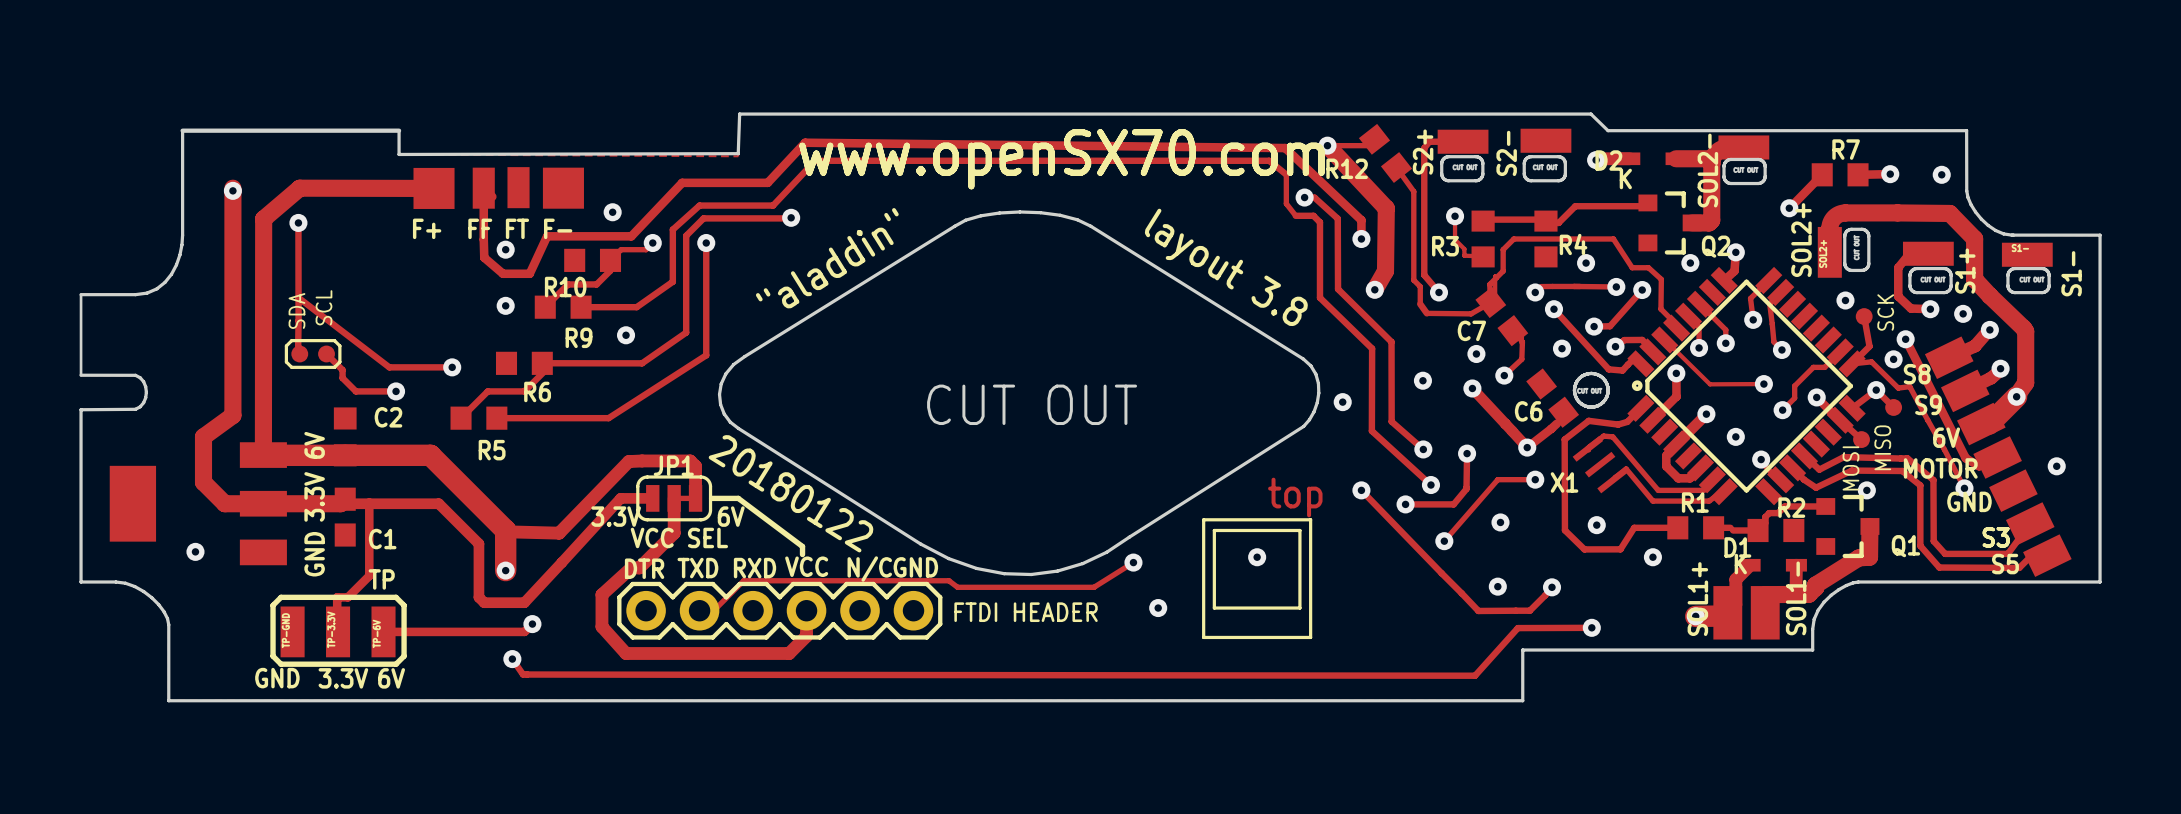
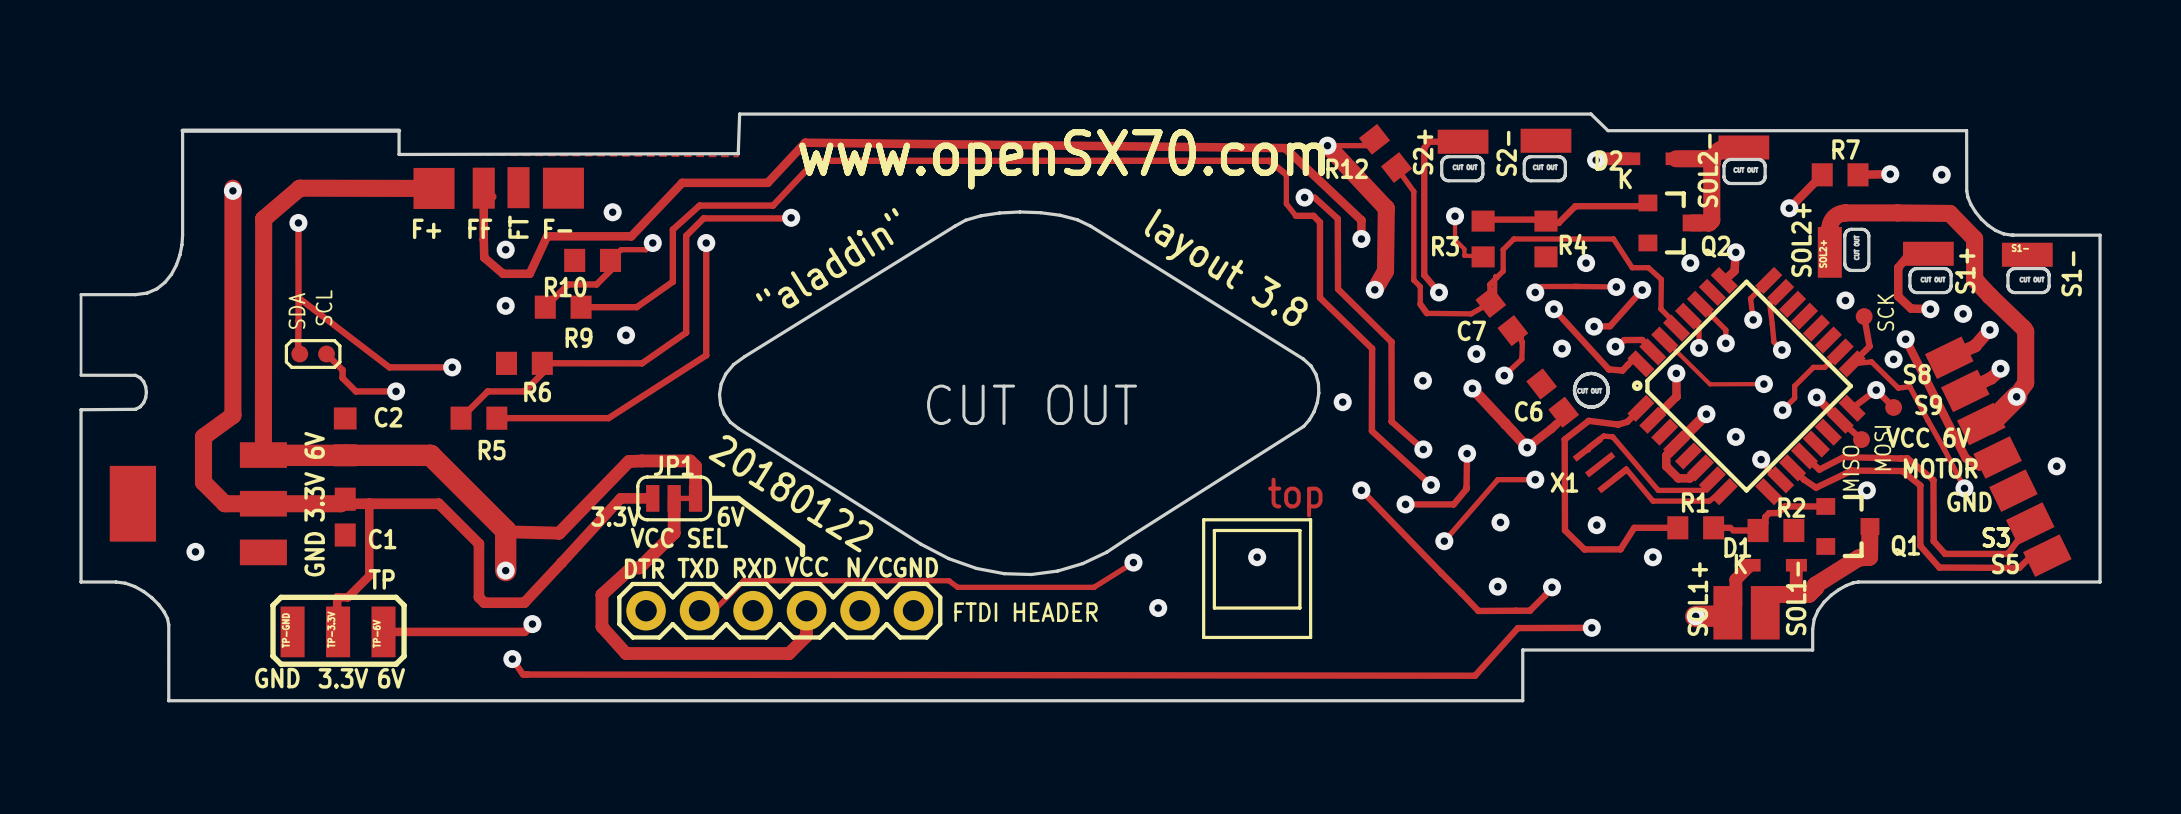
text rotation: 0° (517, 228) -> 90° counterclockwise (518, 227)
text: none -> VCC 6V (1928, 437)
text: 6V (1946, 437) -> none
MISO name: MISO (1882, 447) -> MOSI (1882, 448)
MOSI name: MOSI (1850, 468) -> MISO (1850, 468)

